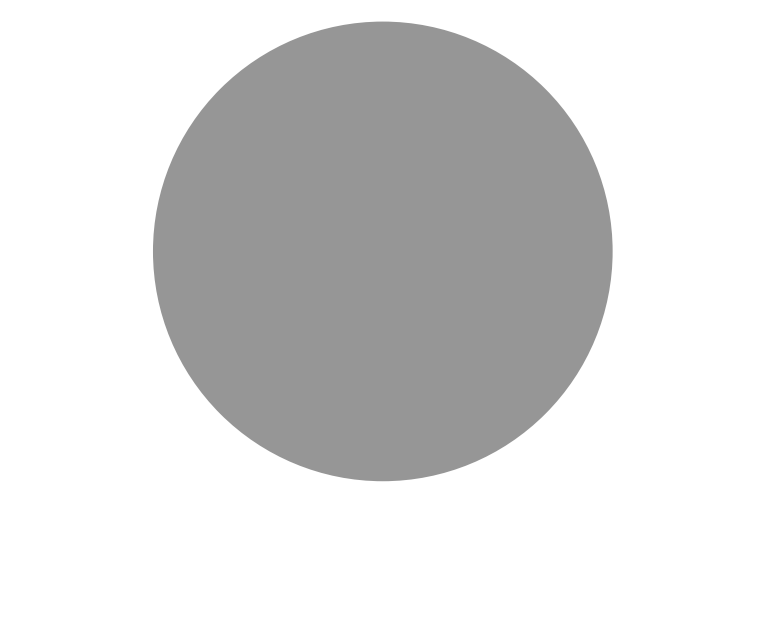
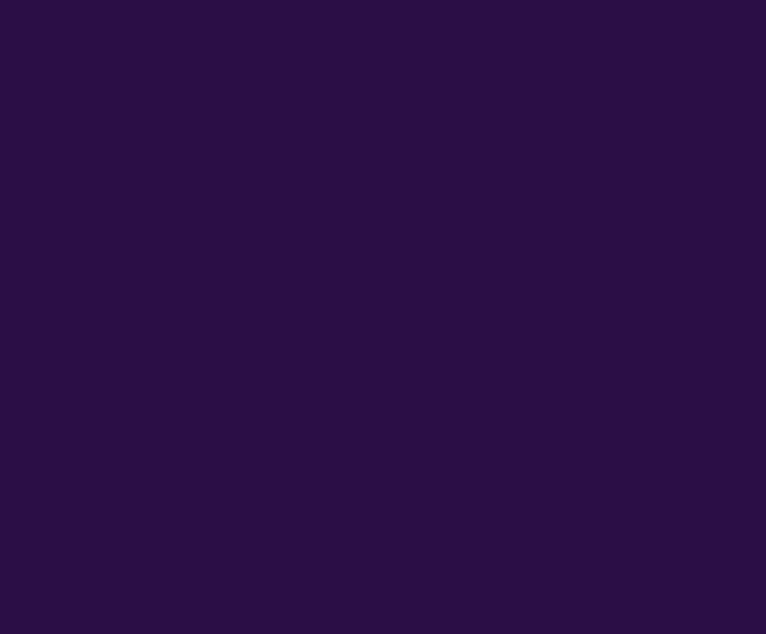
part: (382, 251) -> none

